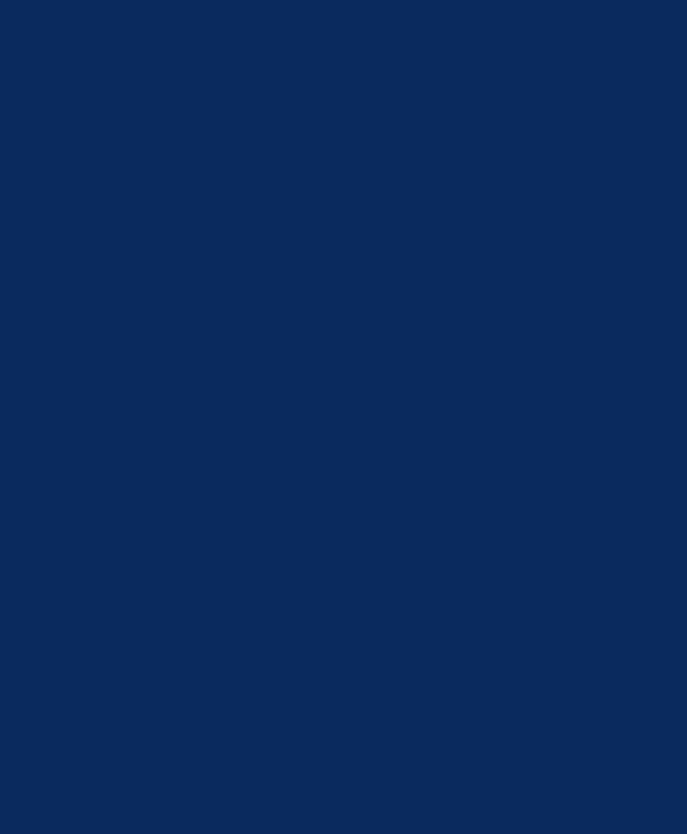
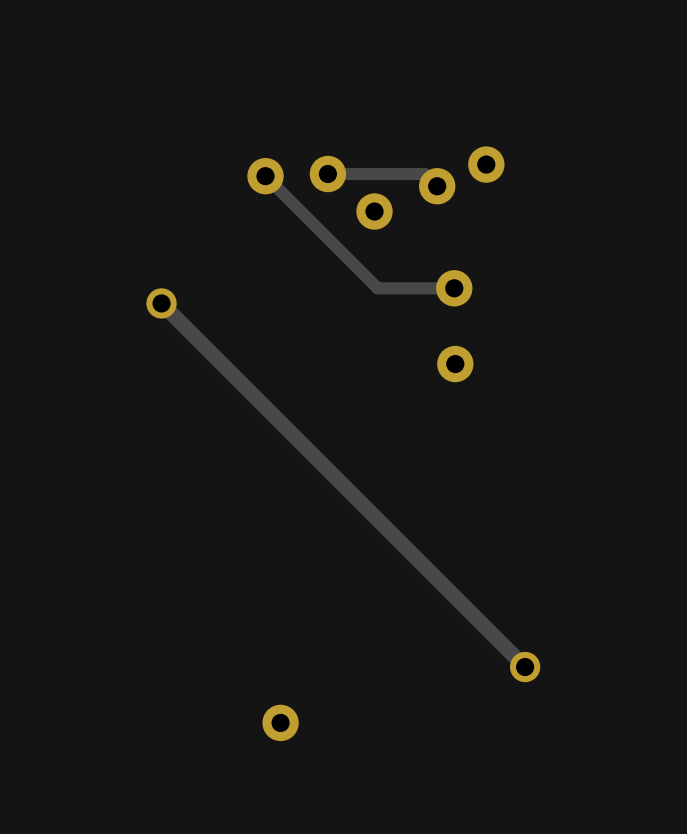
via: none -> (486, 164)
track: none -> (327, 174) (424, 174) (437, 186)
via: none -> (327, 174)
track: none -> (265, 176) (377, 288) (454, 288)
via: none -> (265, 176)
via: none -> (437, 186)
via: none -> (374, 211)
via: none -> (454, 288)
track: none -> (161, 303) (525, 667)
via: none -> (161, 303)
via: none -> (455, 364)
via: none -> (525, 667)
via: none -> (280, 722)

